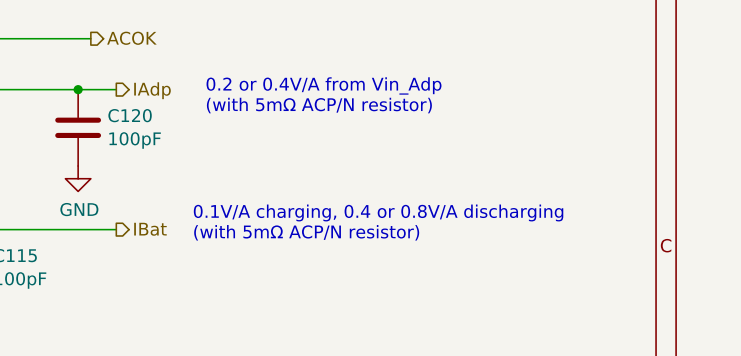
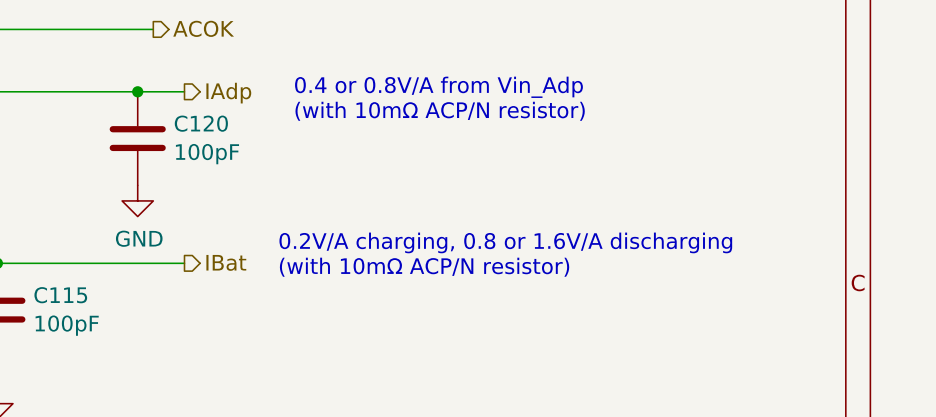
text: 0.2 or 0.4V/A from Vin_Adp (324, 85) -> 0.4 or 0.8V/A from Vin_Adp (438, 87)
text: (with 5mΩ ACP/N resistor) (319, 105) -> (with 10mΩ ACP/N resistor) (440, 111)
text: 0.1V/A charging, 0.4 or 0.8V/A discharging (378, 212) -> 0.2V/A charging, 0.8 or 1.6V/A discharging (505, 242)
text: (with 5mΩ ACP/N resistor) (306, 232) -> (with 10mΩ ACP/N resistor) (424, 267)

